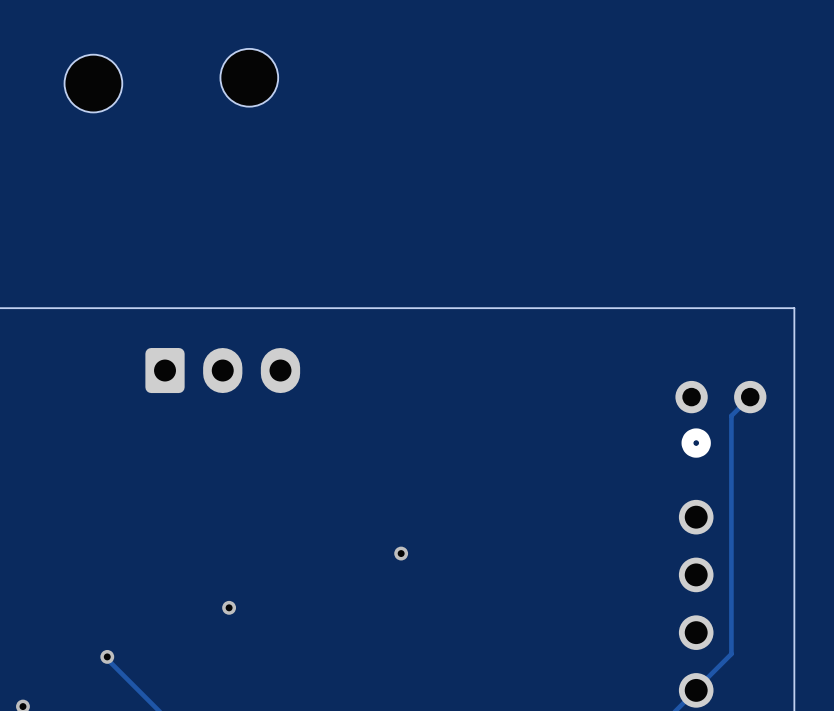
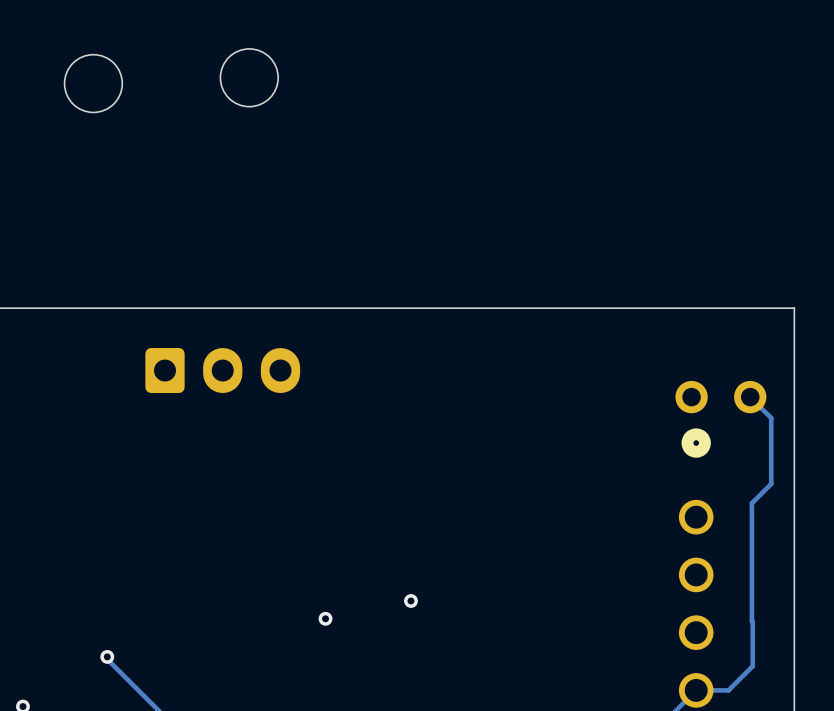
track: (750, 397) (731, 415) (731, 654) (696, 690) -> (750, 397) (771, 418) (771, 483) (751, 503) (752, 666) (728, 690) (696, 690)
via position: (401, 553) -> (410, 600)
via: (229, 607) -> none
via: none -> (325, 618)

